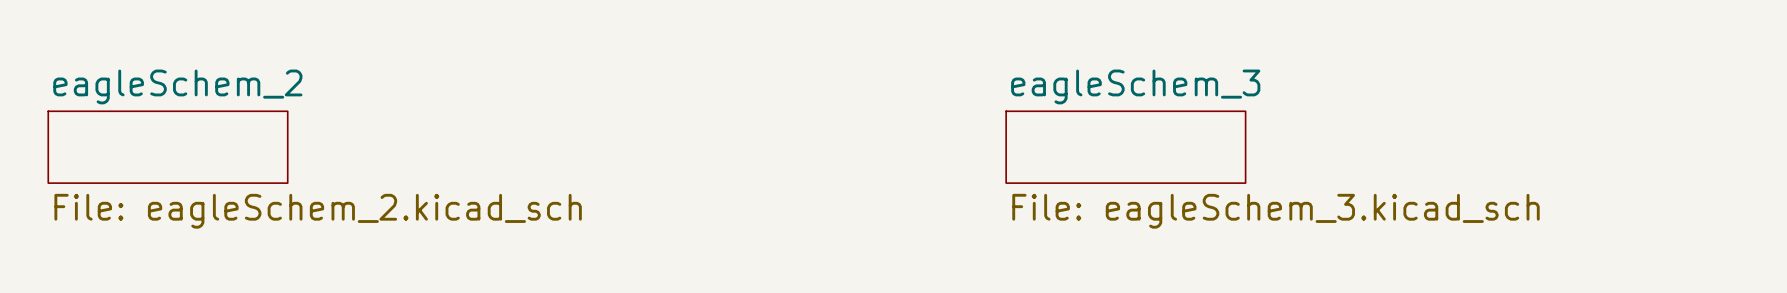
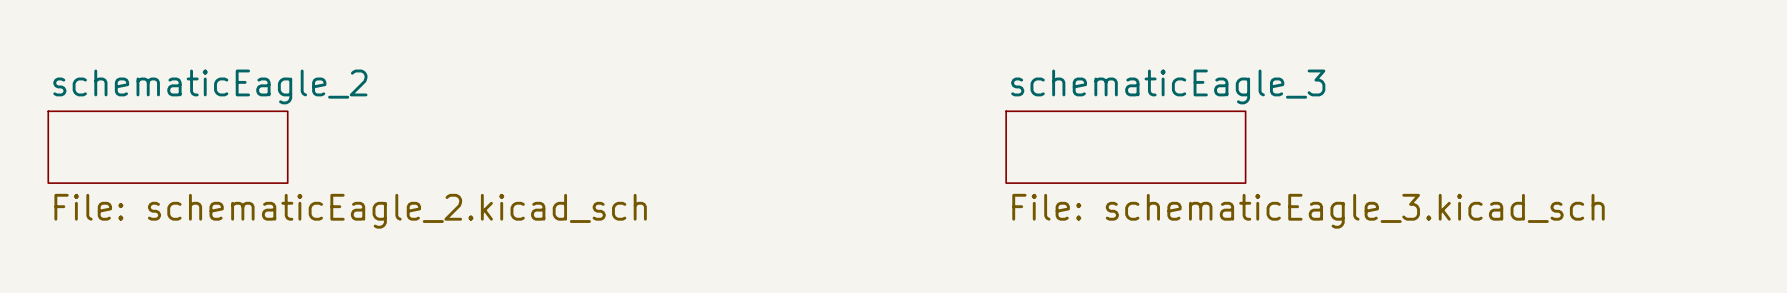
sheet eagleSchem_2 name: eagleSchem_2 (177, 86) -> schematicEagle_2 (210, 86)
sheet eagleSchem_3 name: eagleSchem_3 (1135, 86) -> schematicEagle_3 (1168, 86)
sheet eagleSchem_2 value: File: eagleSchem_2.kicad_sch (318, 211) -> File: schematicEagle_2.kicad_sch (350, 211)
sheet eagleSchem_3 value: File: eagleSchem_3.kicad_sch (1275, 211) -> File: schematicEagle_3.kicad_sch (1308, 211)

